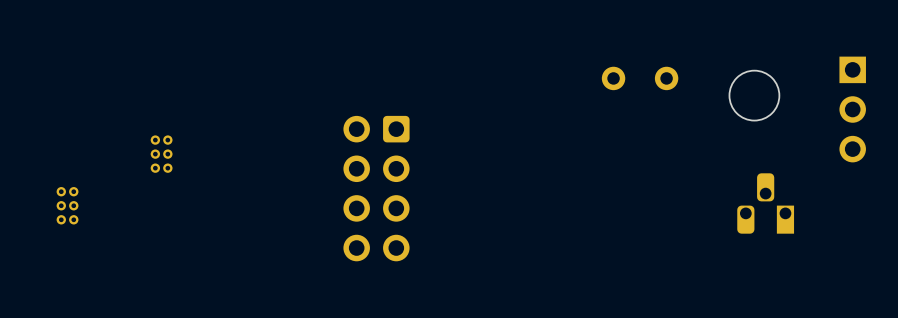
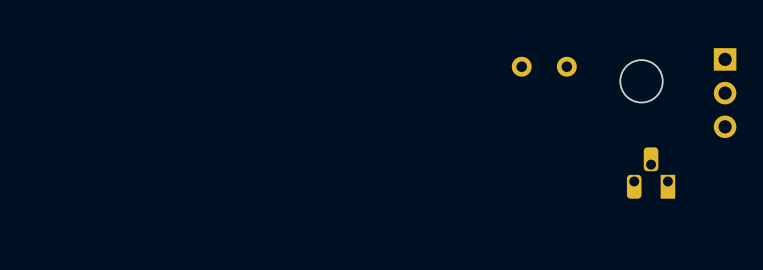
part: (161, 154) -> none
part: (376, 188) -> none
part: (67, 205) -> none

